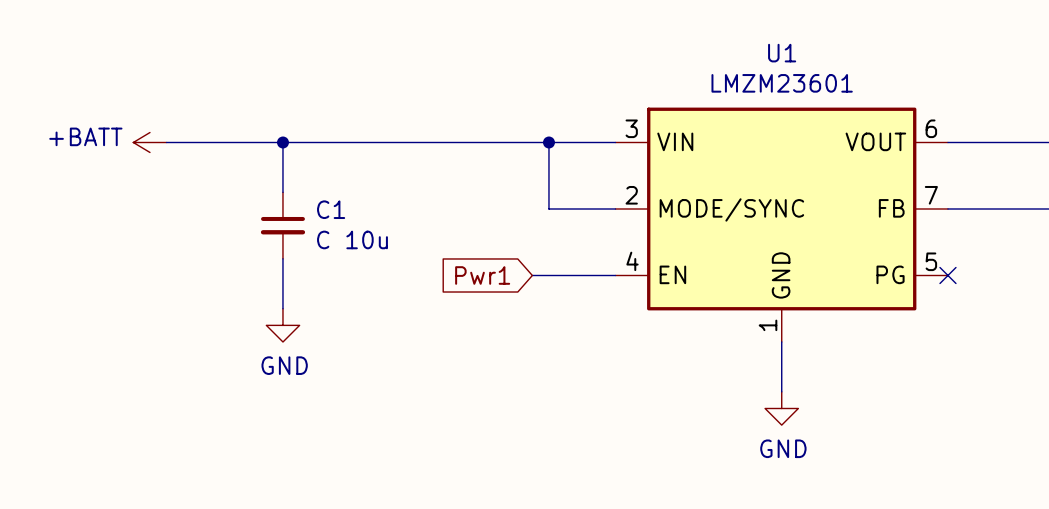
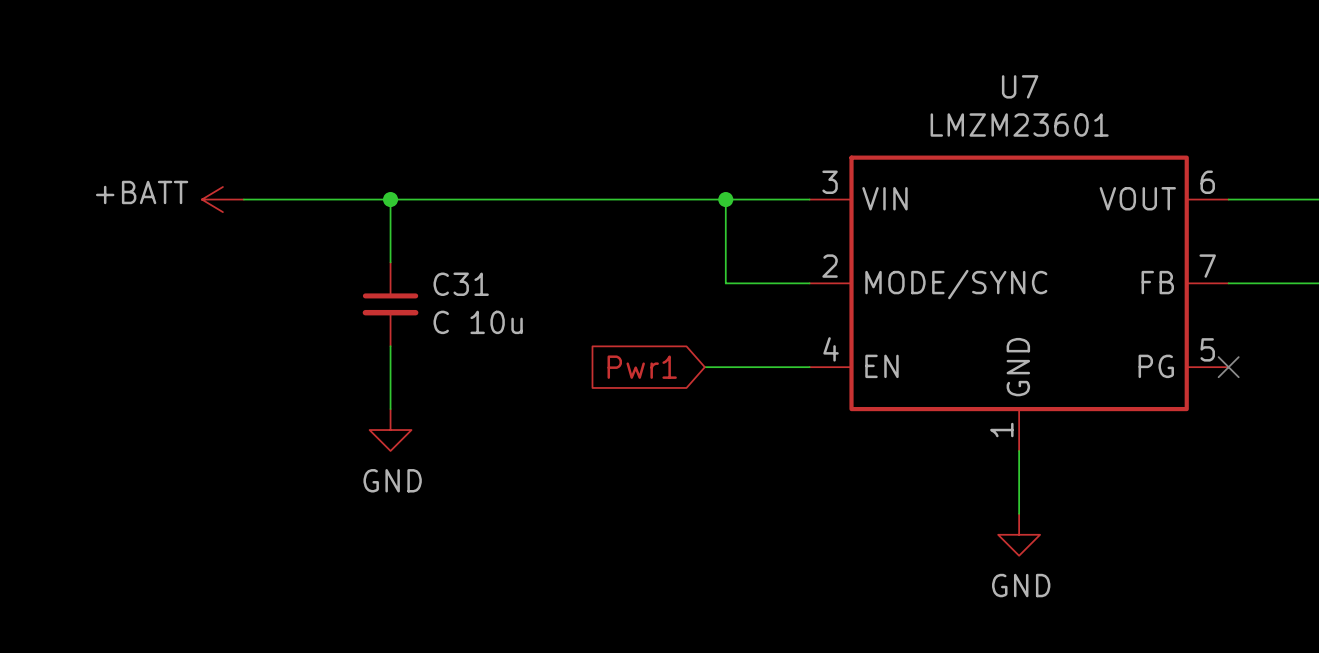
U1 name: U1 (782, 53) -> U7 (1020, 86)
C1 name: C1 (331, 209) -> C31 (461, 284)

